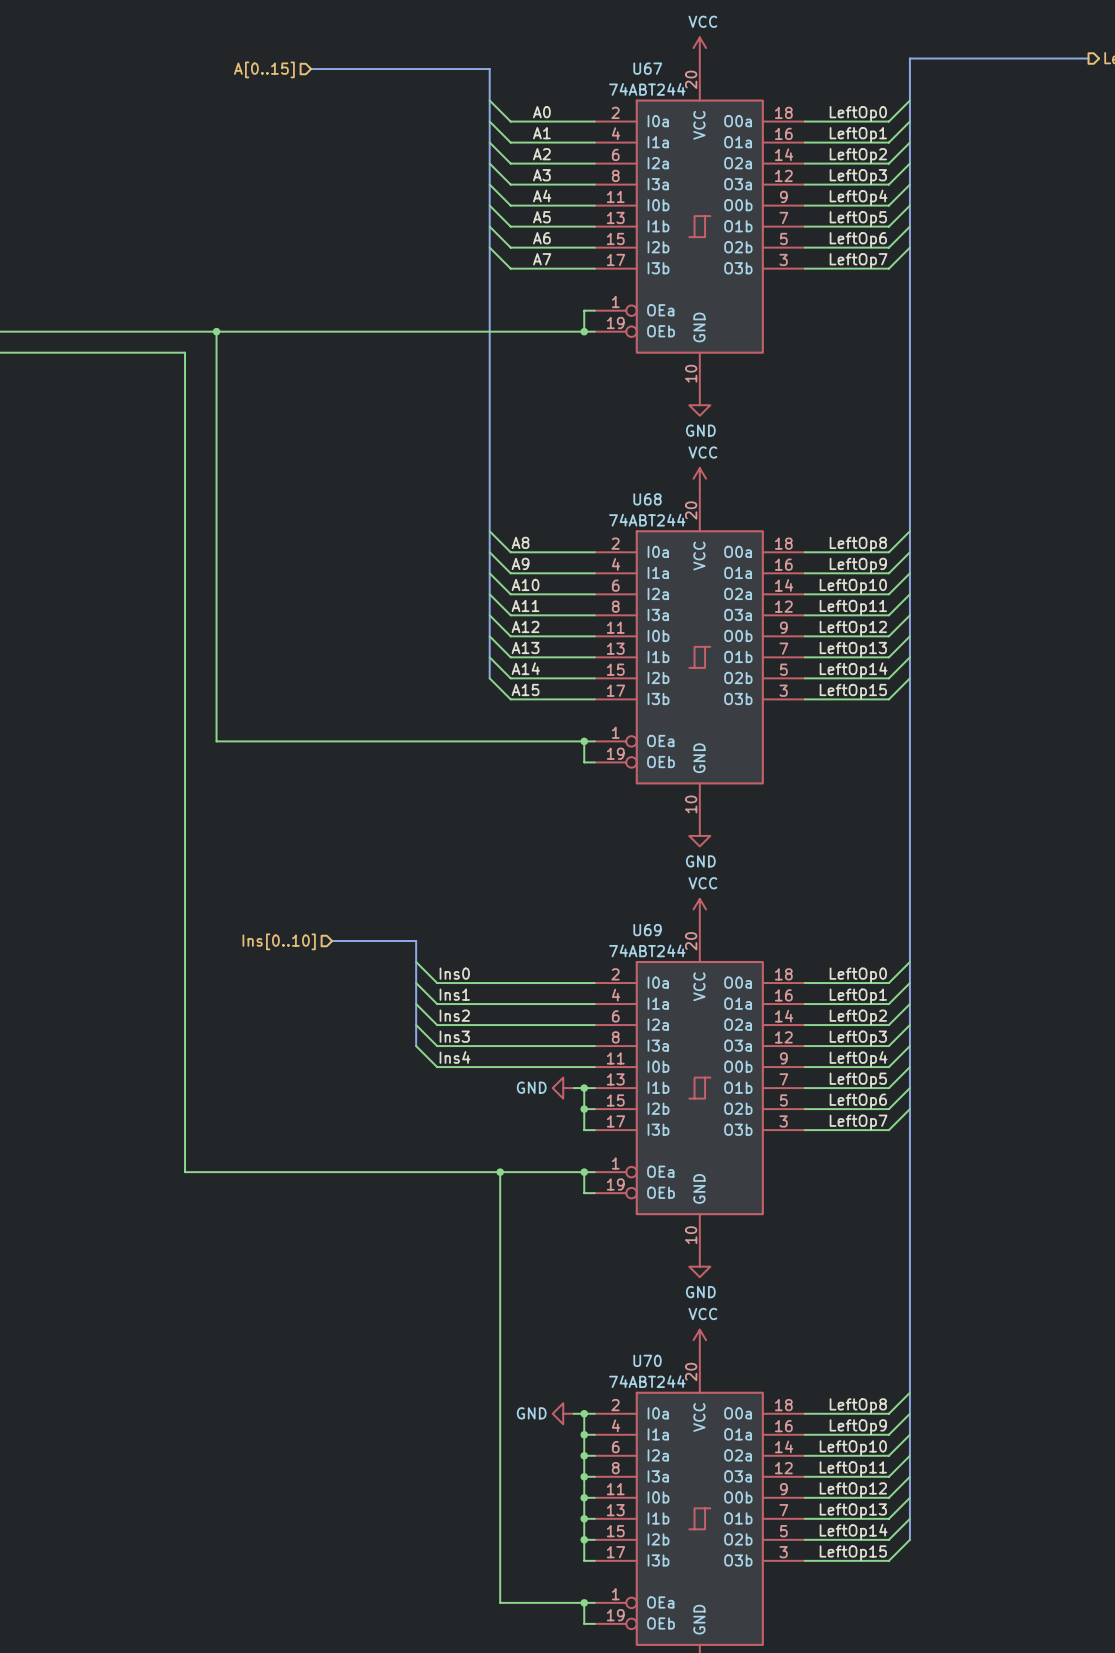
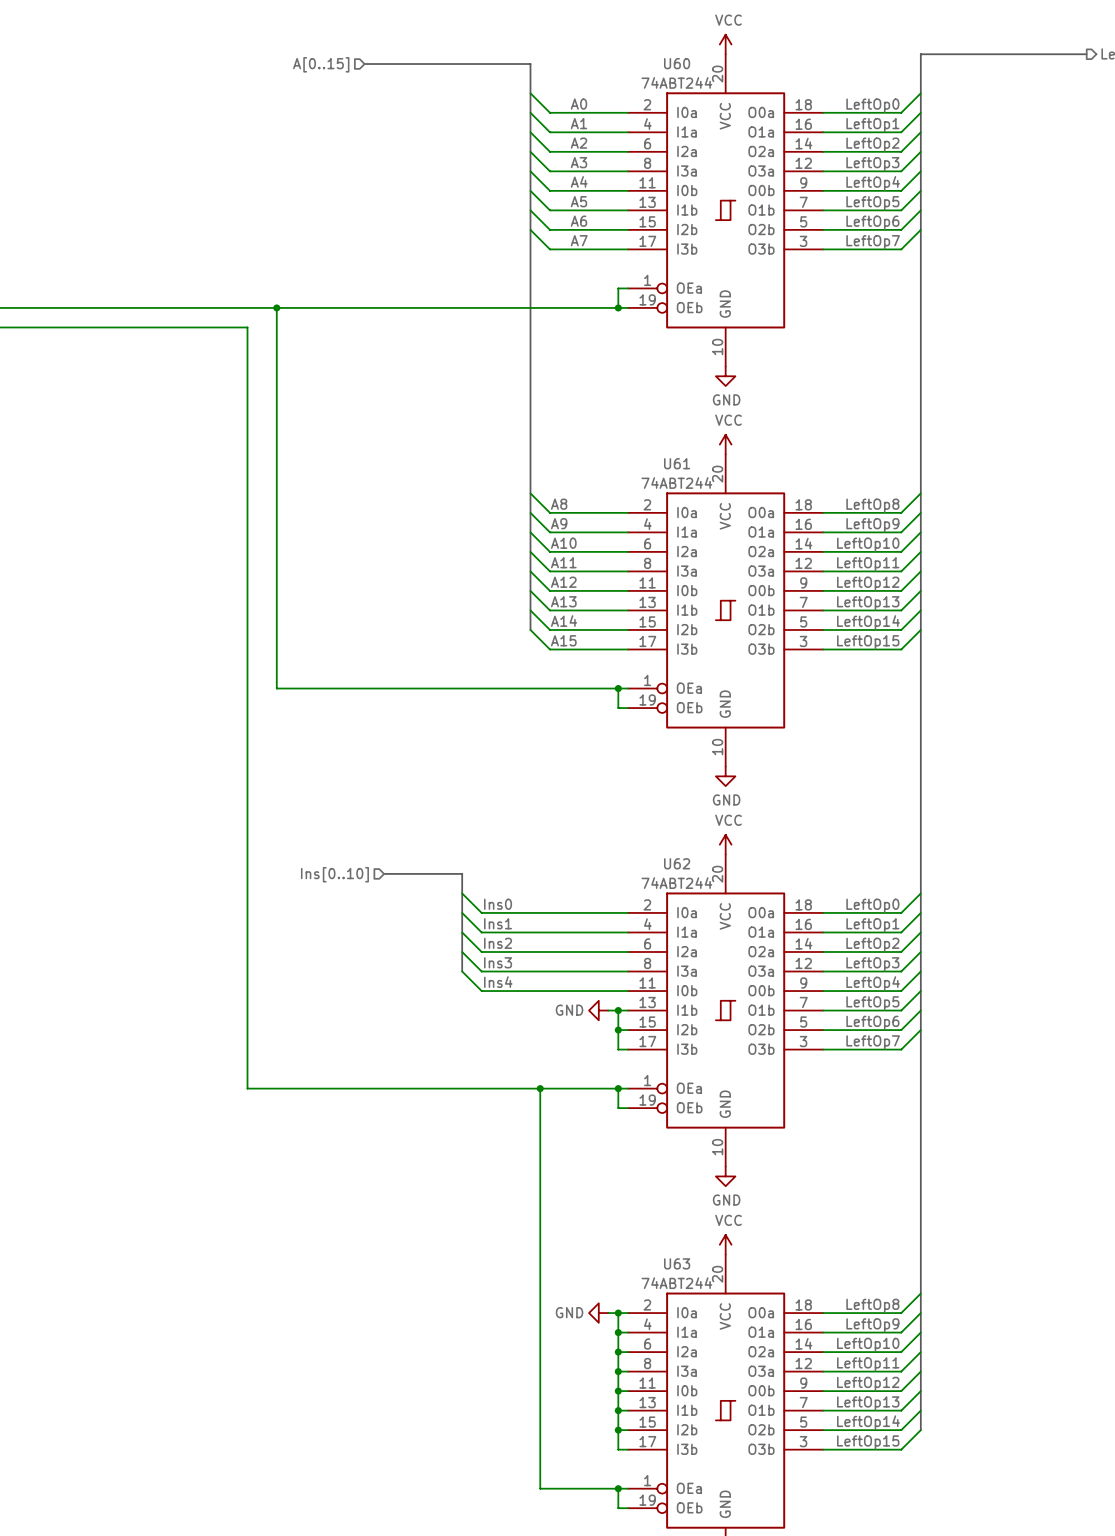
U67 name: U67 (647, 68) -> U60 (677, 63)
U68 name: U68 (647, 499) -> U61 (677, 463)
U69 name: U69 (647, 930) -> U62 (677, 863)
U70 name: U70 (647, 1360) -> U63 (677, 1263)

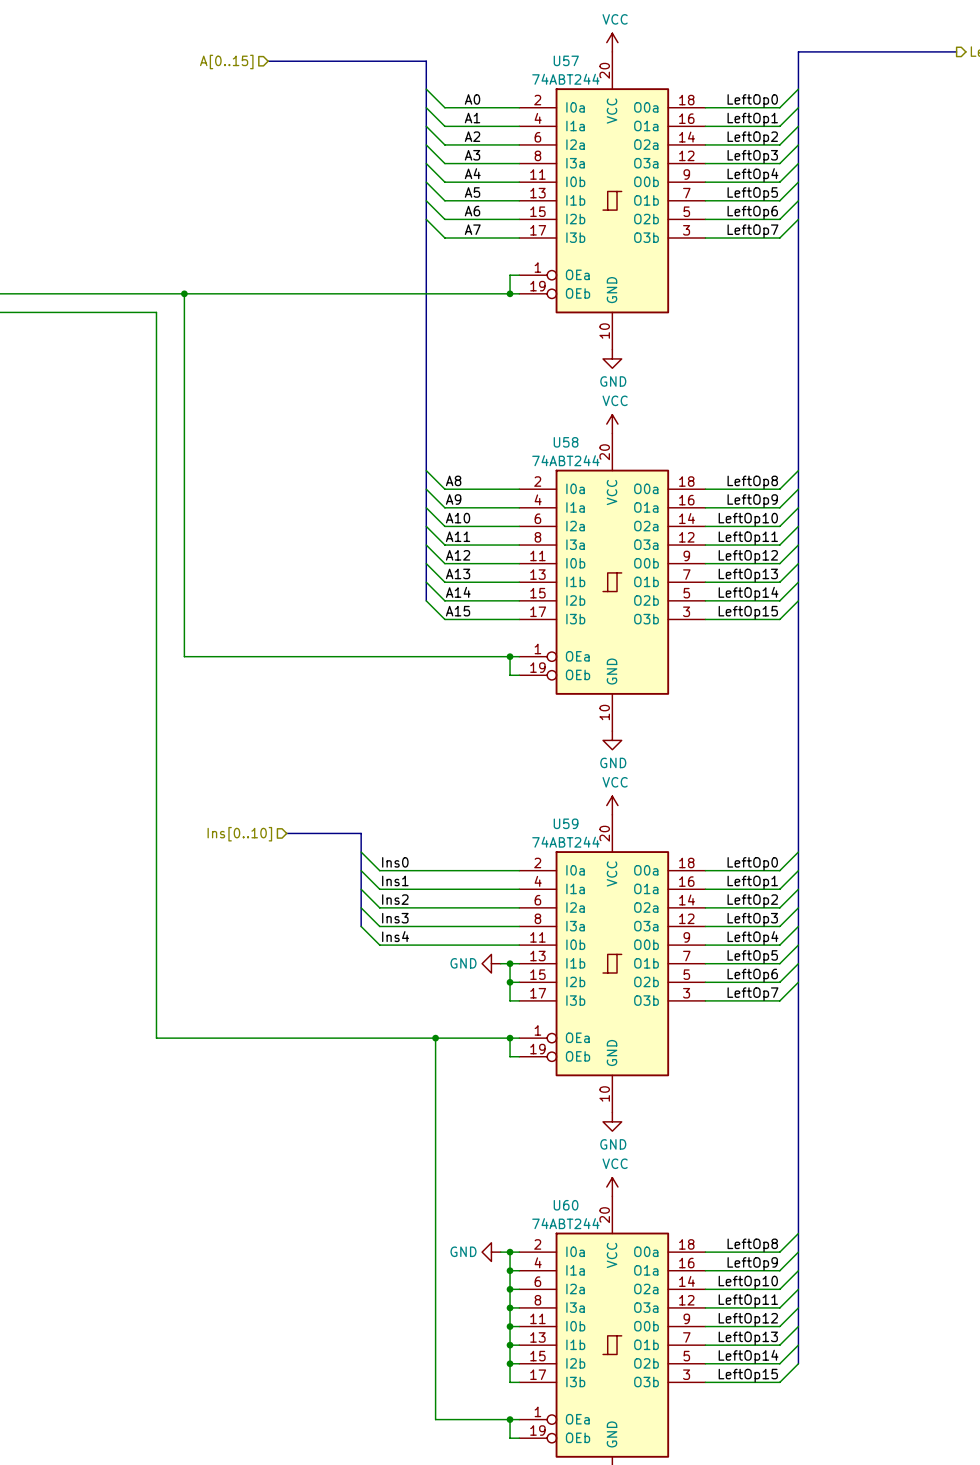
U60 name: U60 (677, 63) -> U57 (566, 60)
U61 name: U61 (677, 463) -> U58 (566, 442)
U62 name: U62 (677, 863) -> U59 (566, 823)
U63 name: U63 (677, 1263) -> U60 (566, 1205)

